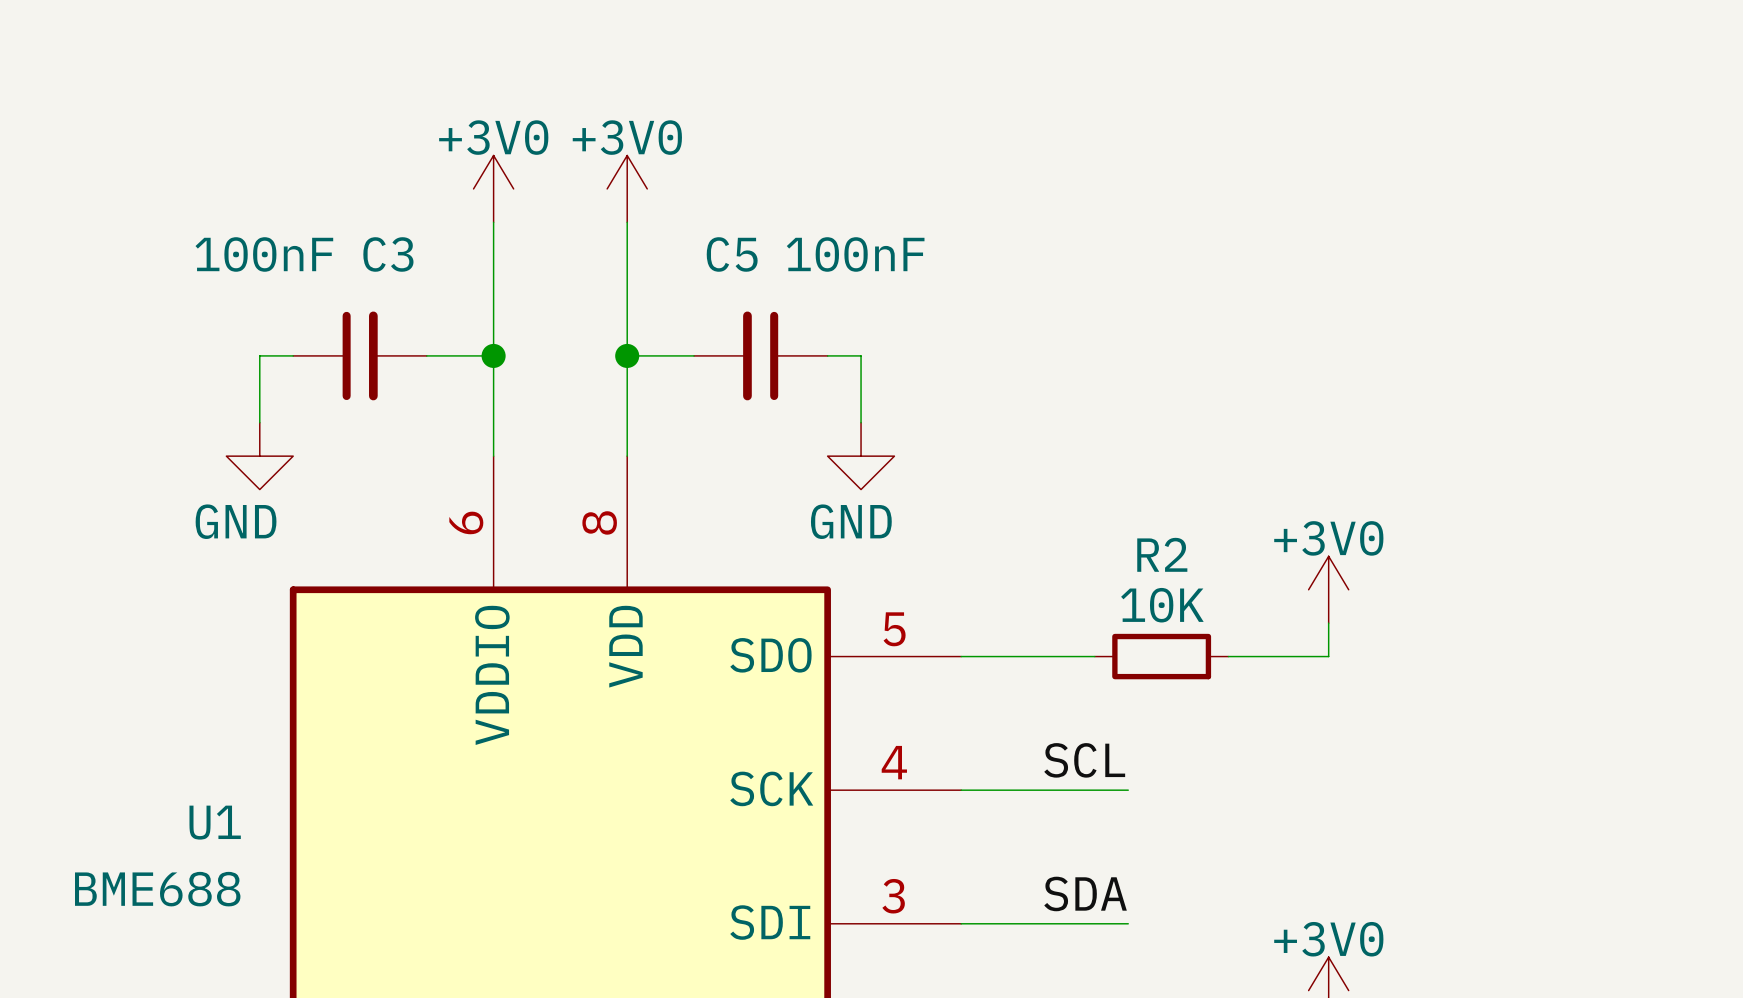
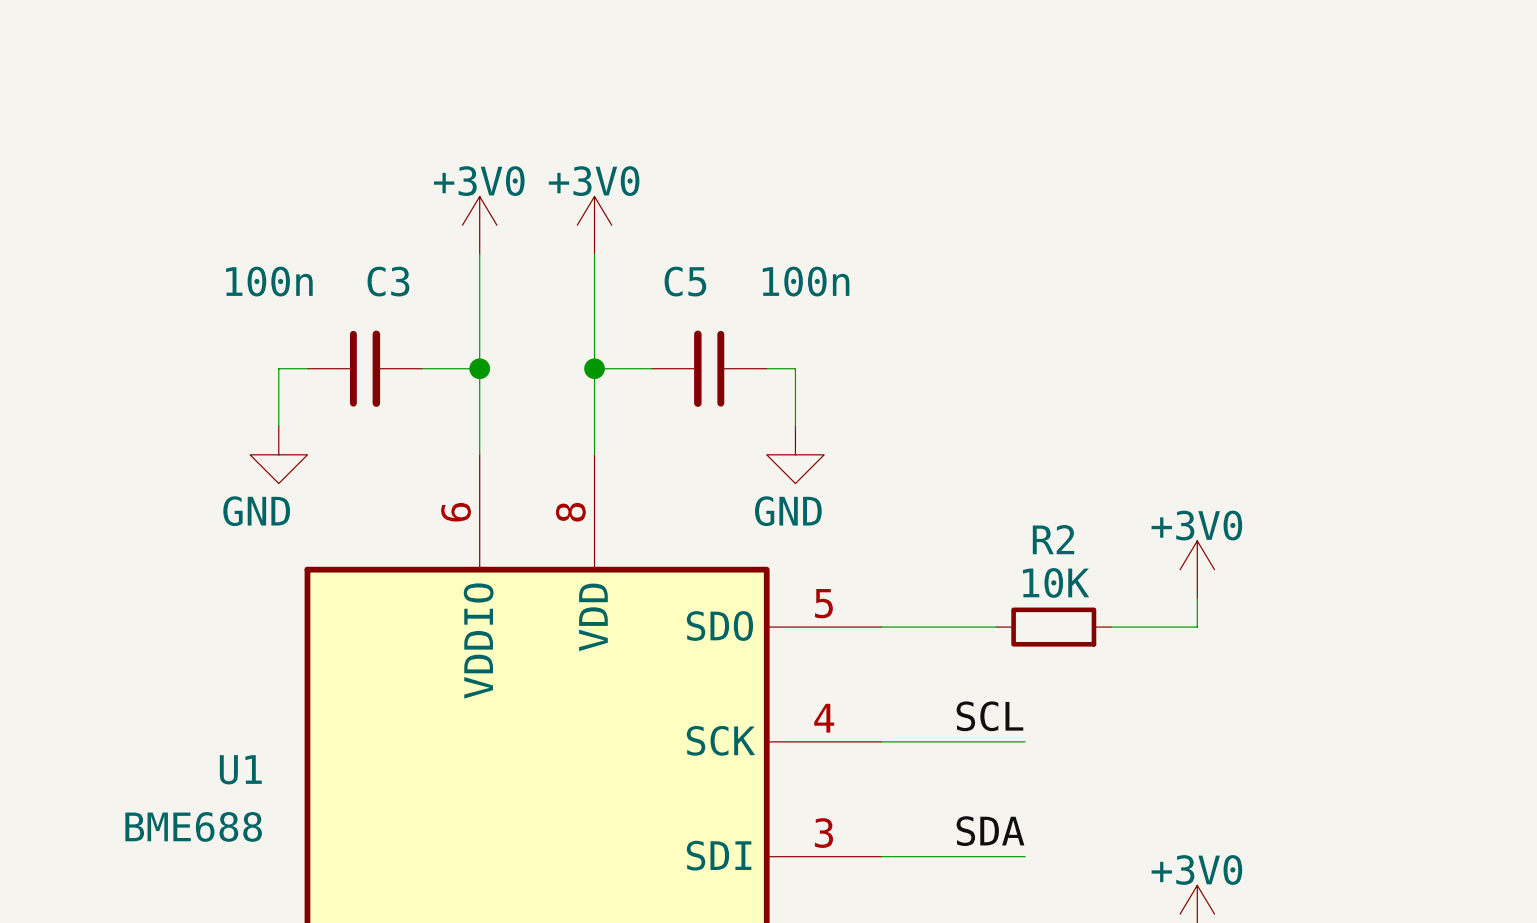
C3 value: 100nF (264, 254) -> 100n (269, 281)
C5 value: 100nF (855, 254) -> 100n (806, 281)

